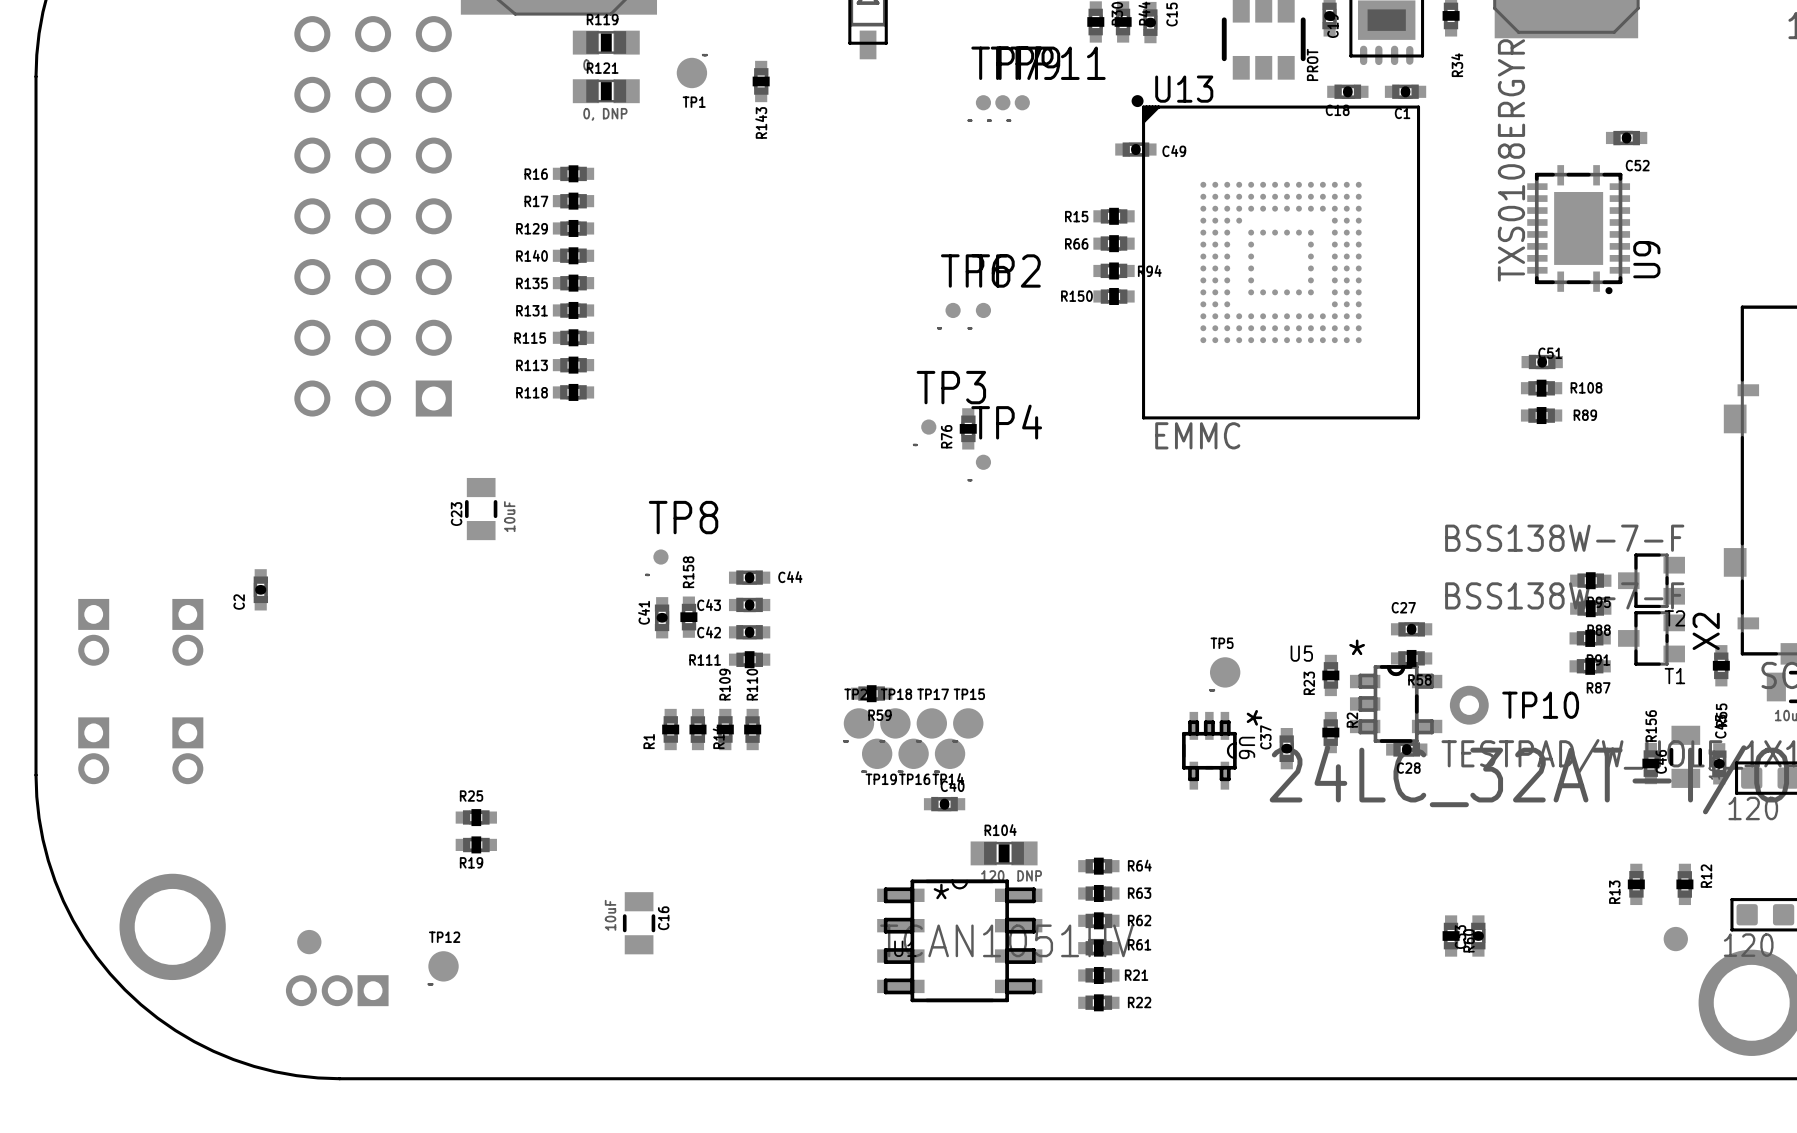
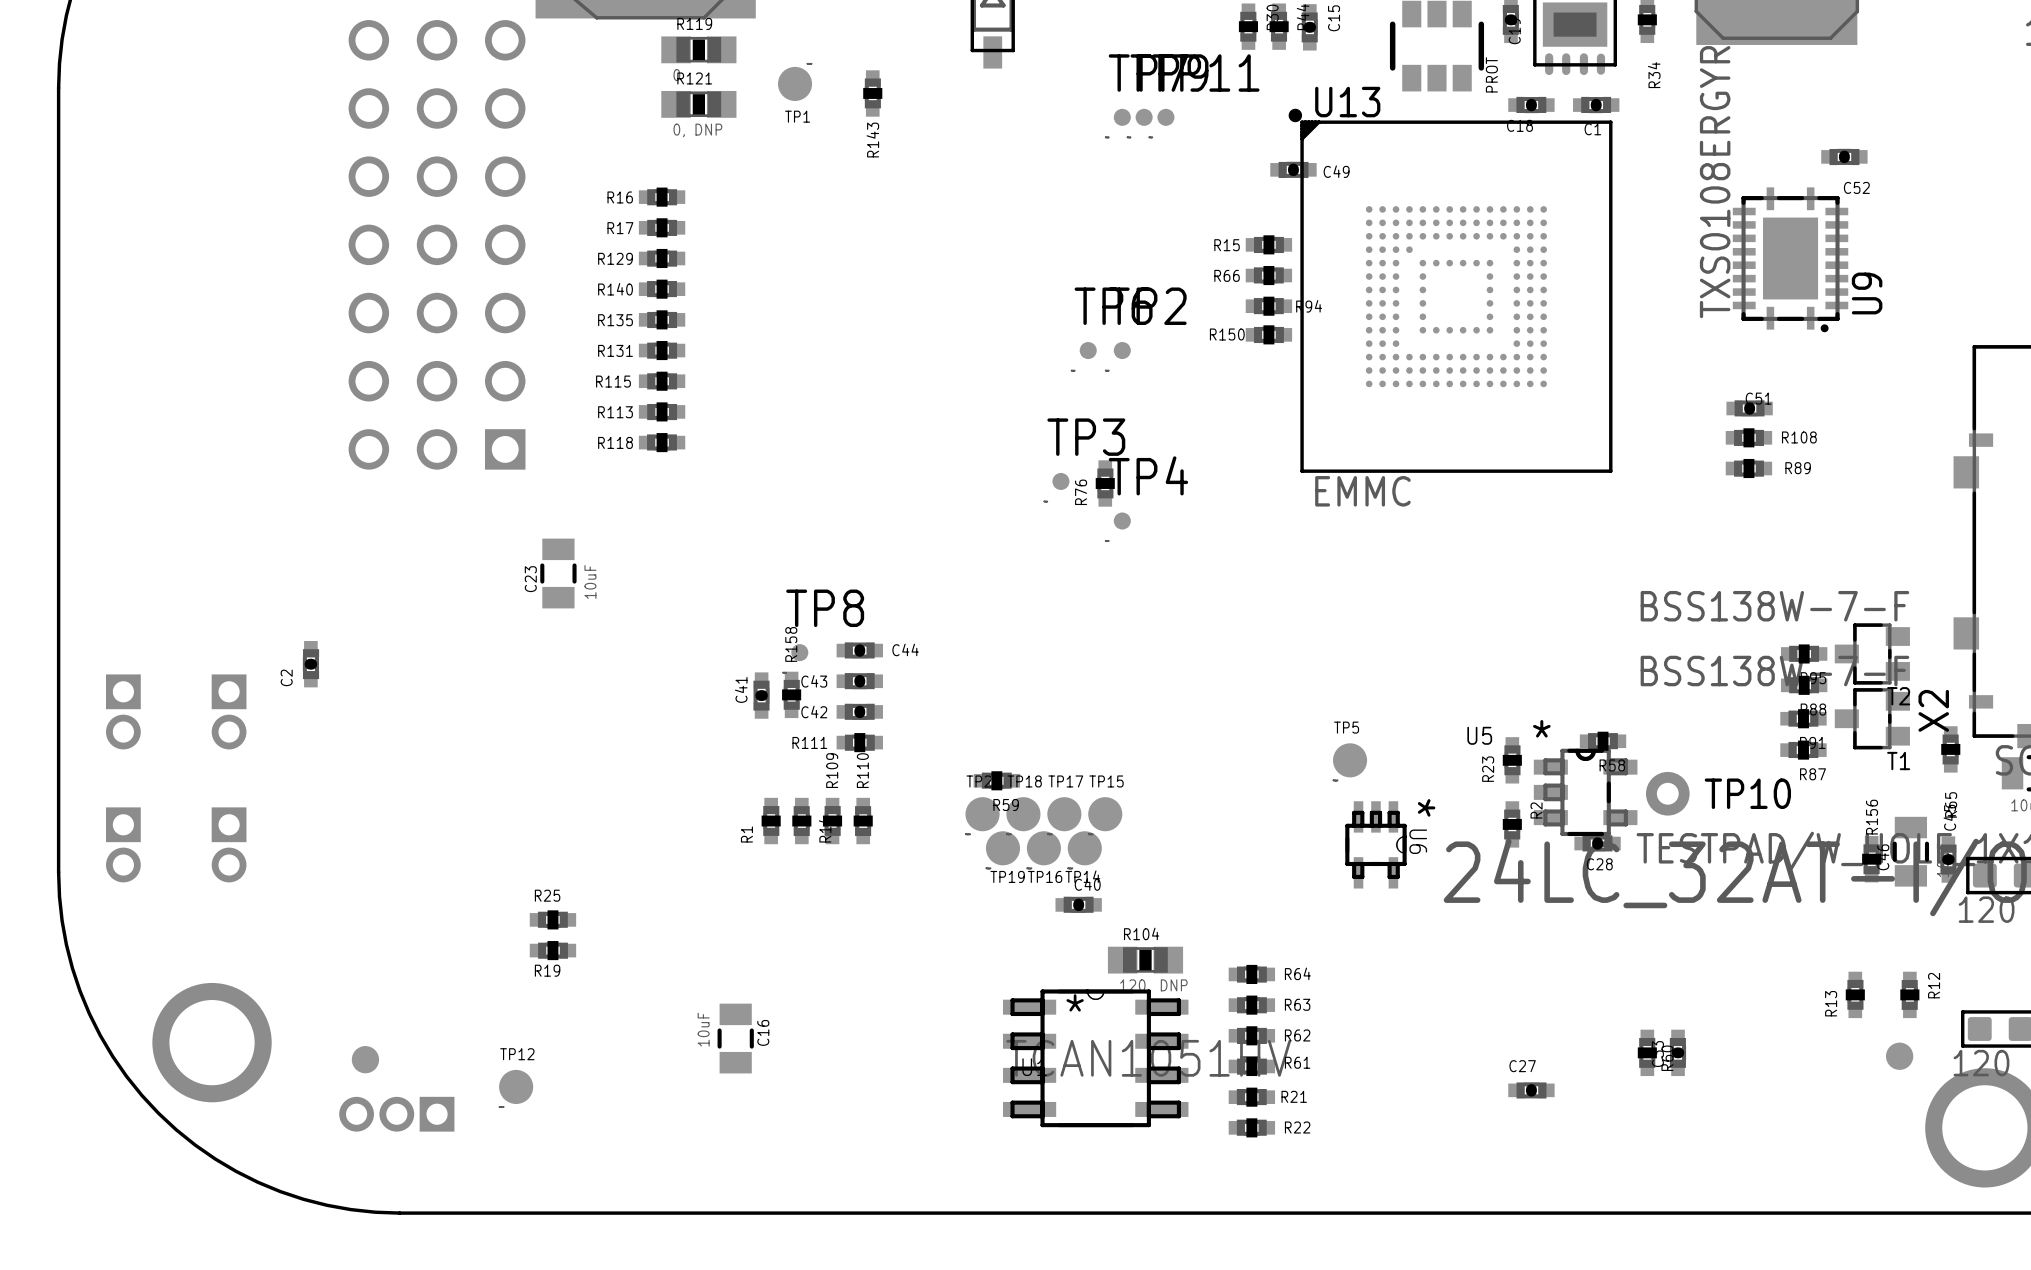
TP8 position: (660, 557) -> (799, 652)
C27 position: (1411, 629) -> (1531, 1090)
TP5 position: (1225, 672) -> (1350, 760)
C37: (1286, 748) -> none

